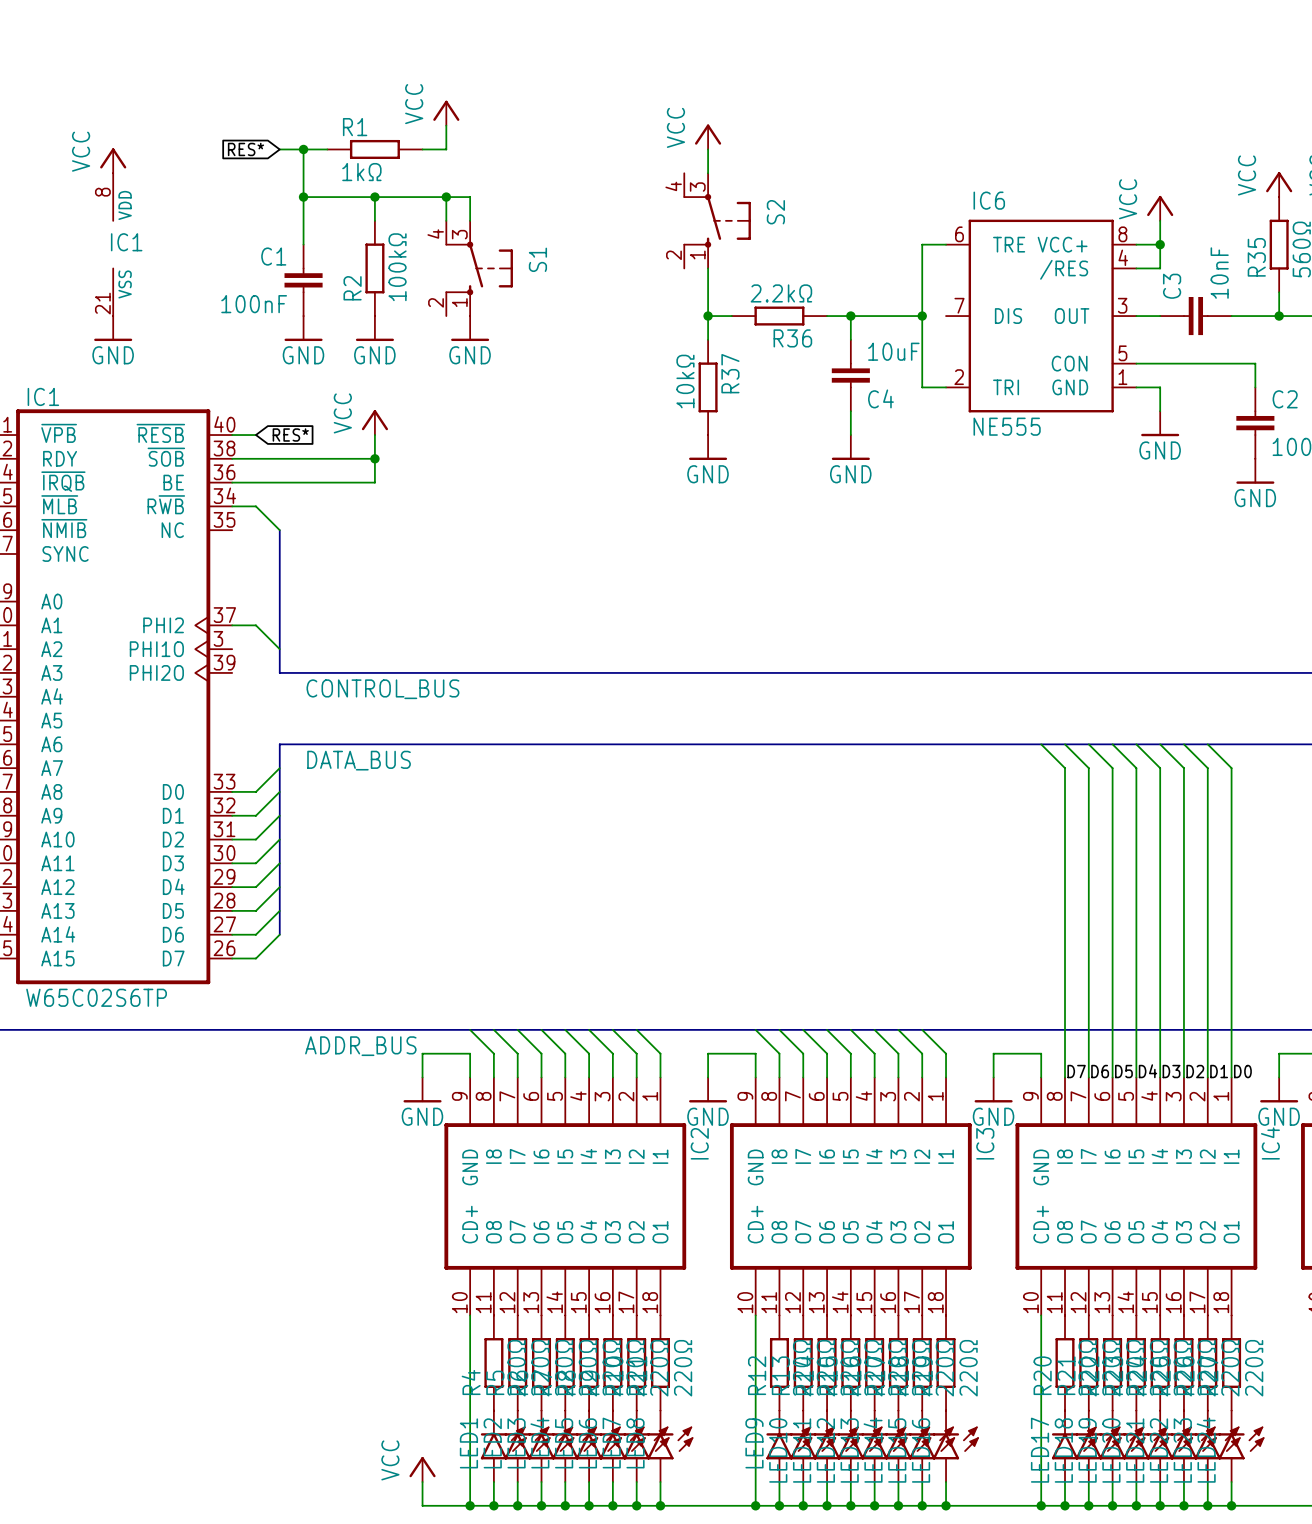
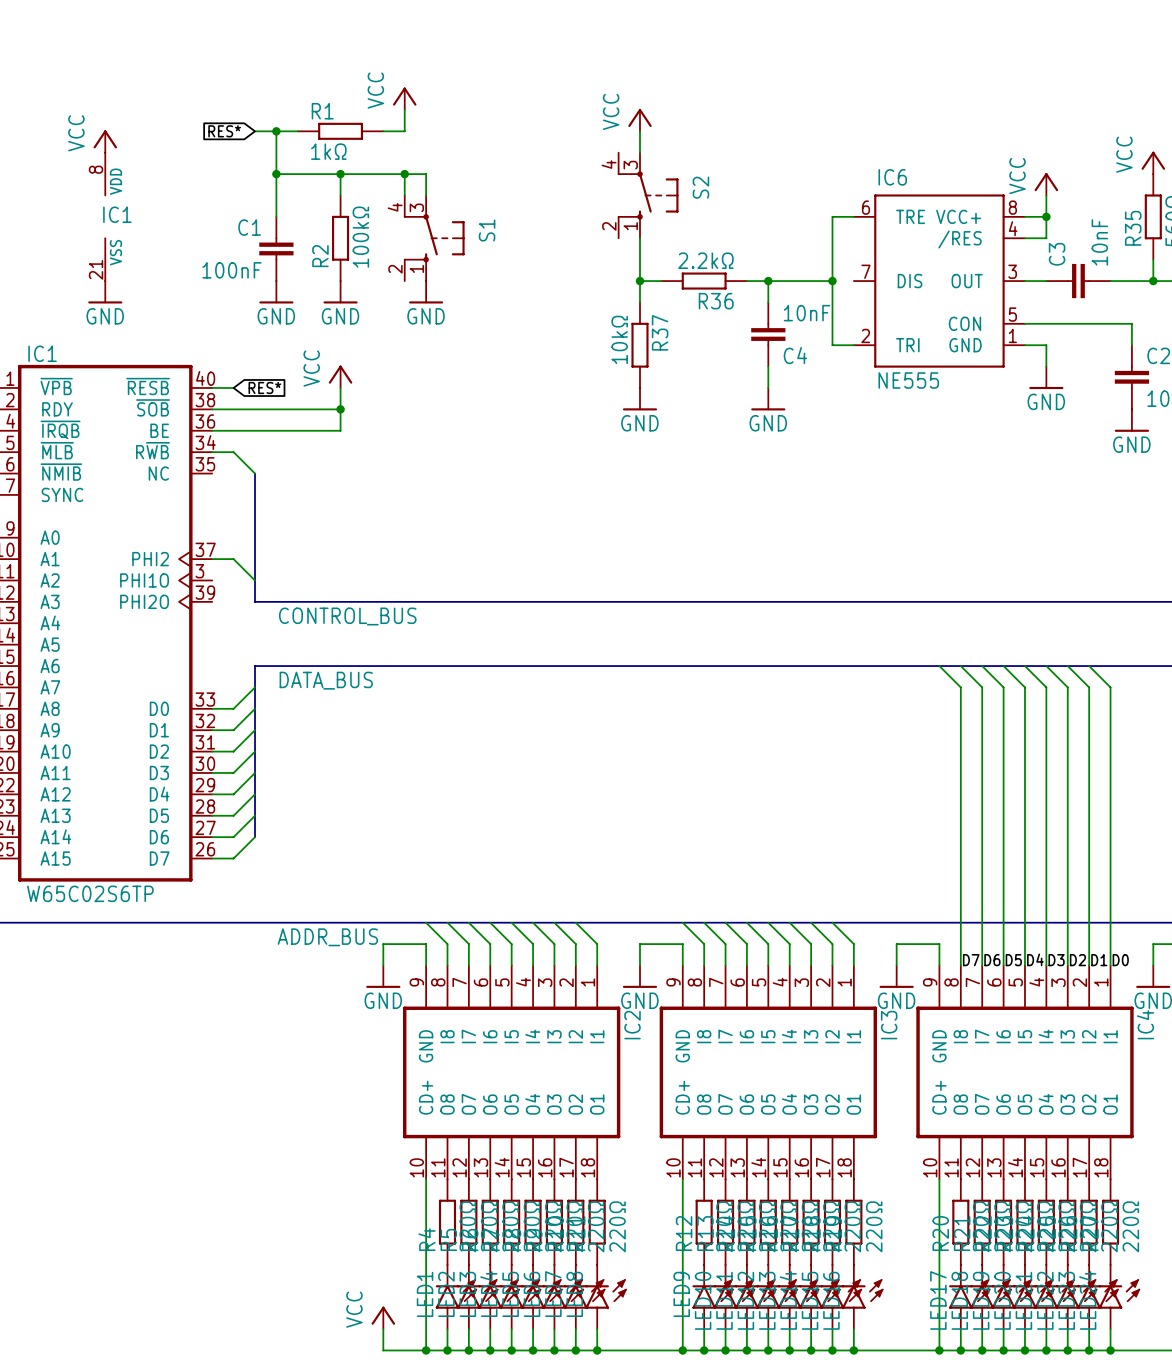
C4 value: 10uF (893, 351) -> 10nF (806, 313)

